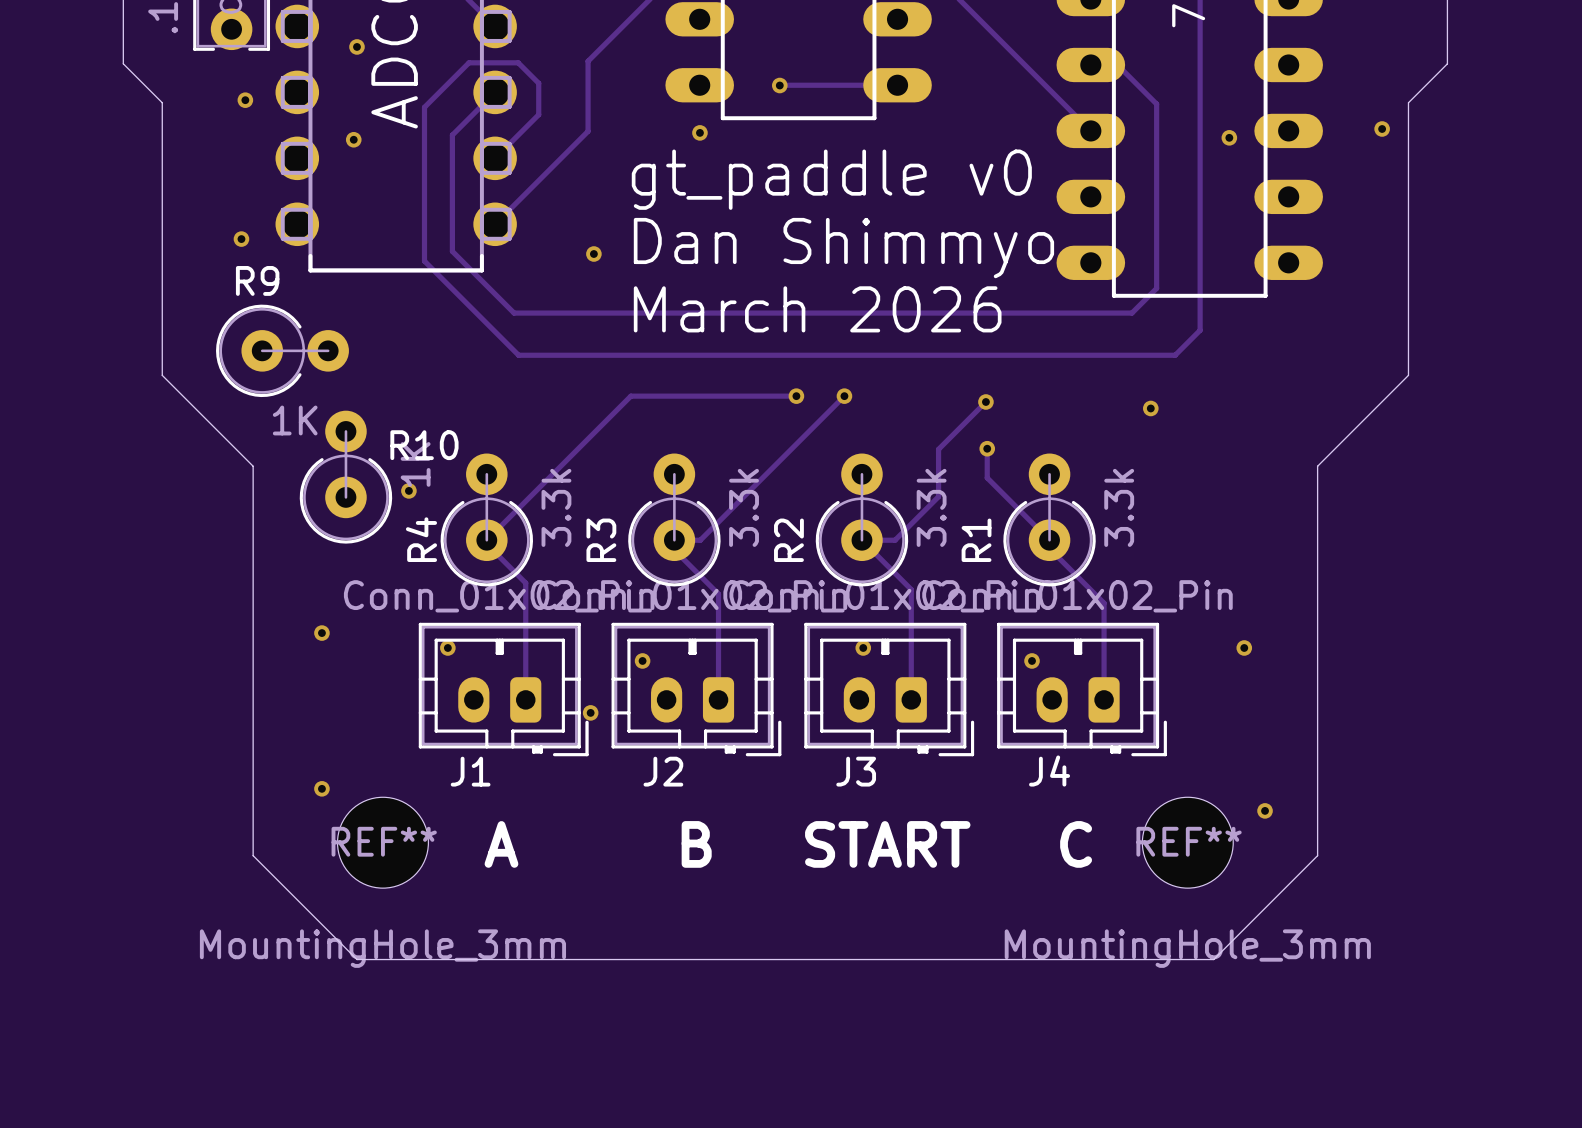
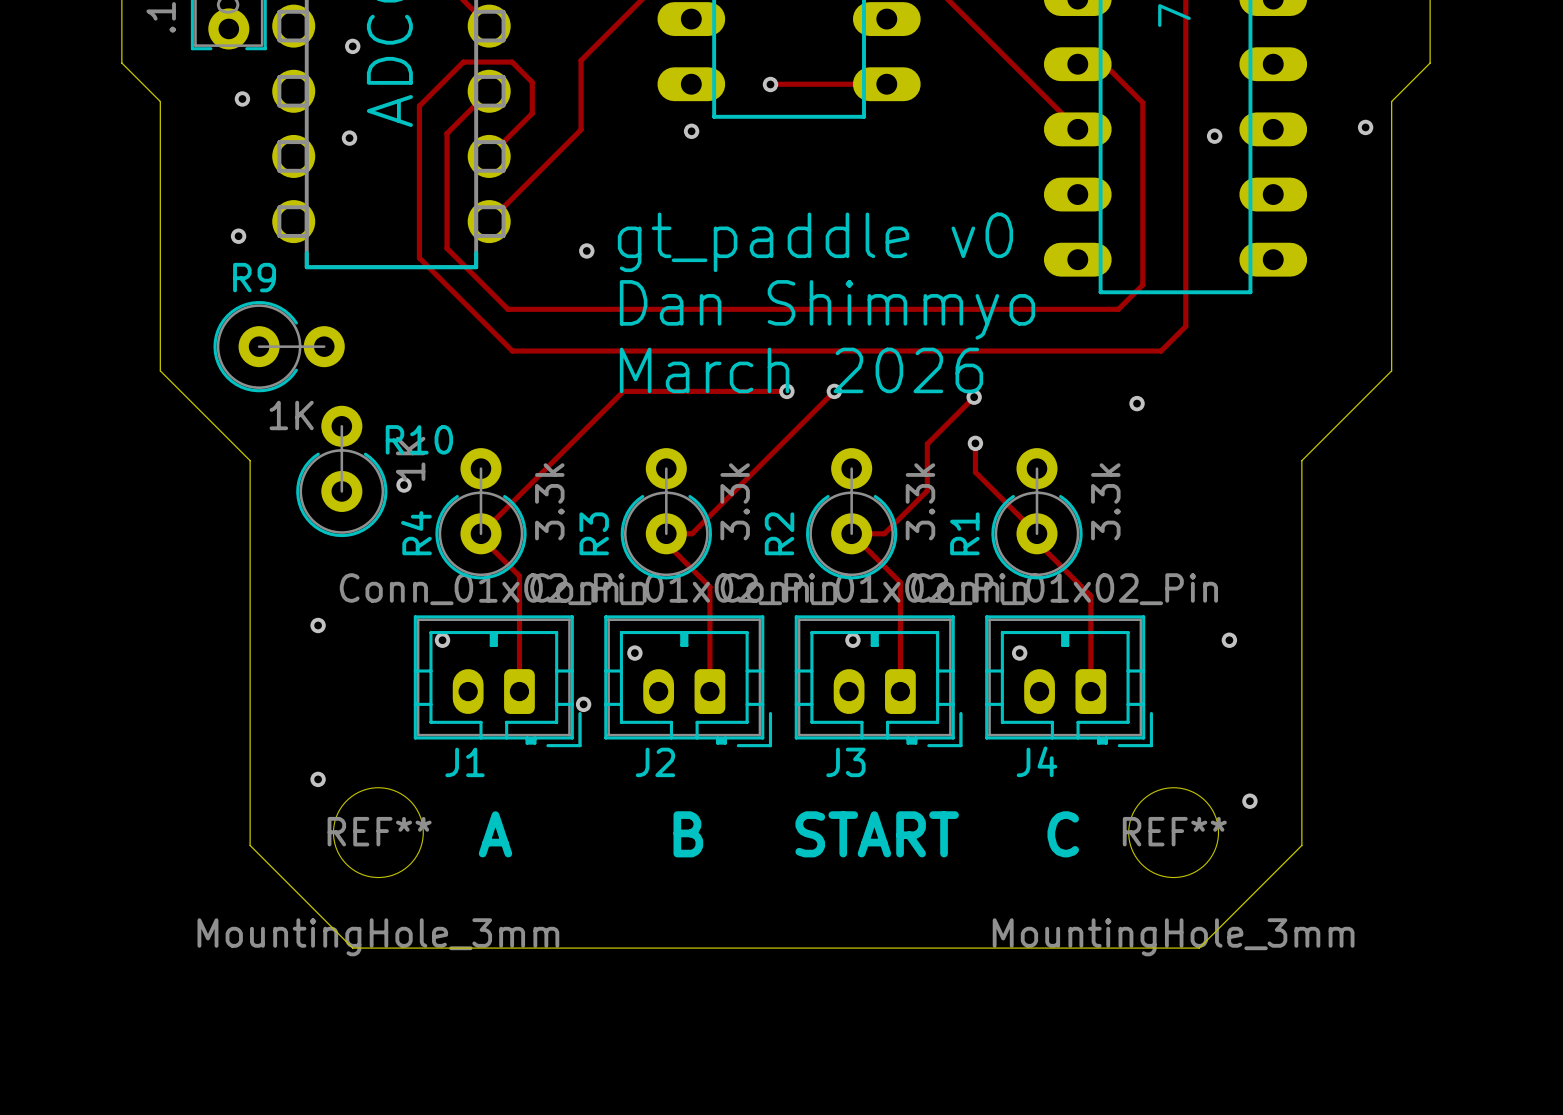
text: gt_paddle v0 (831, 179) -> none
text: Dan Shimmyo (843, 248) -> gt_paddle v0 (815, 242)
text: March 2026 (817, 309) -> Dan Shimmyo (827, 309)
text: none -> March 2026 (801, 370)

